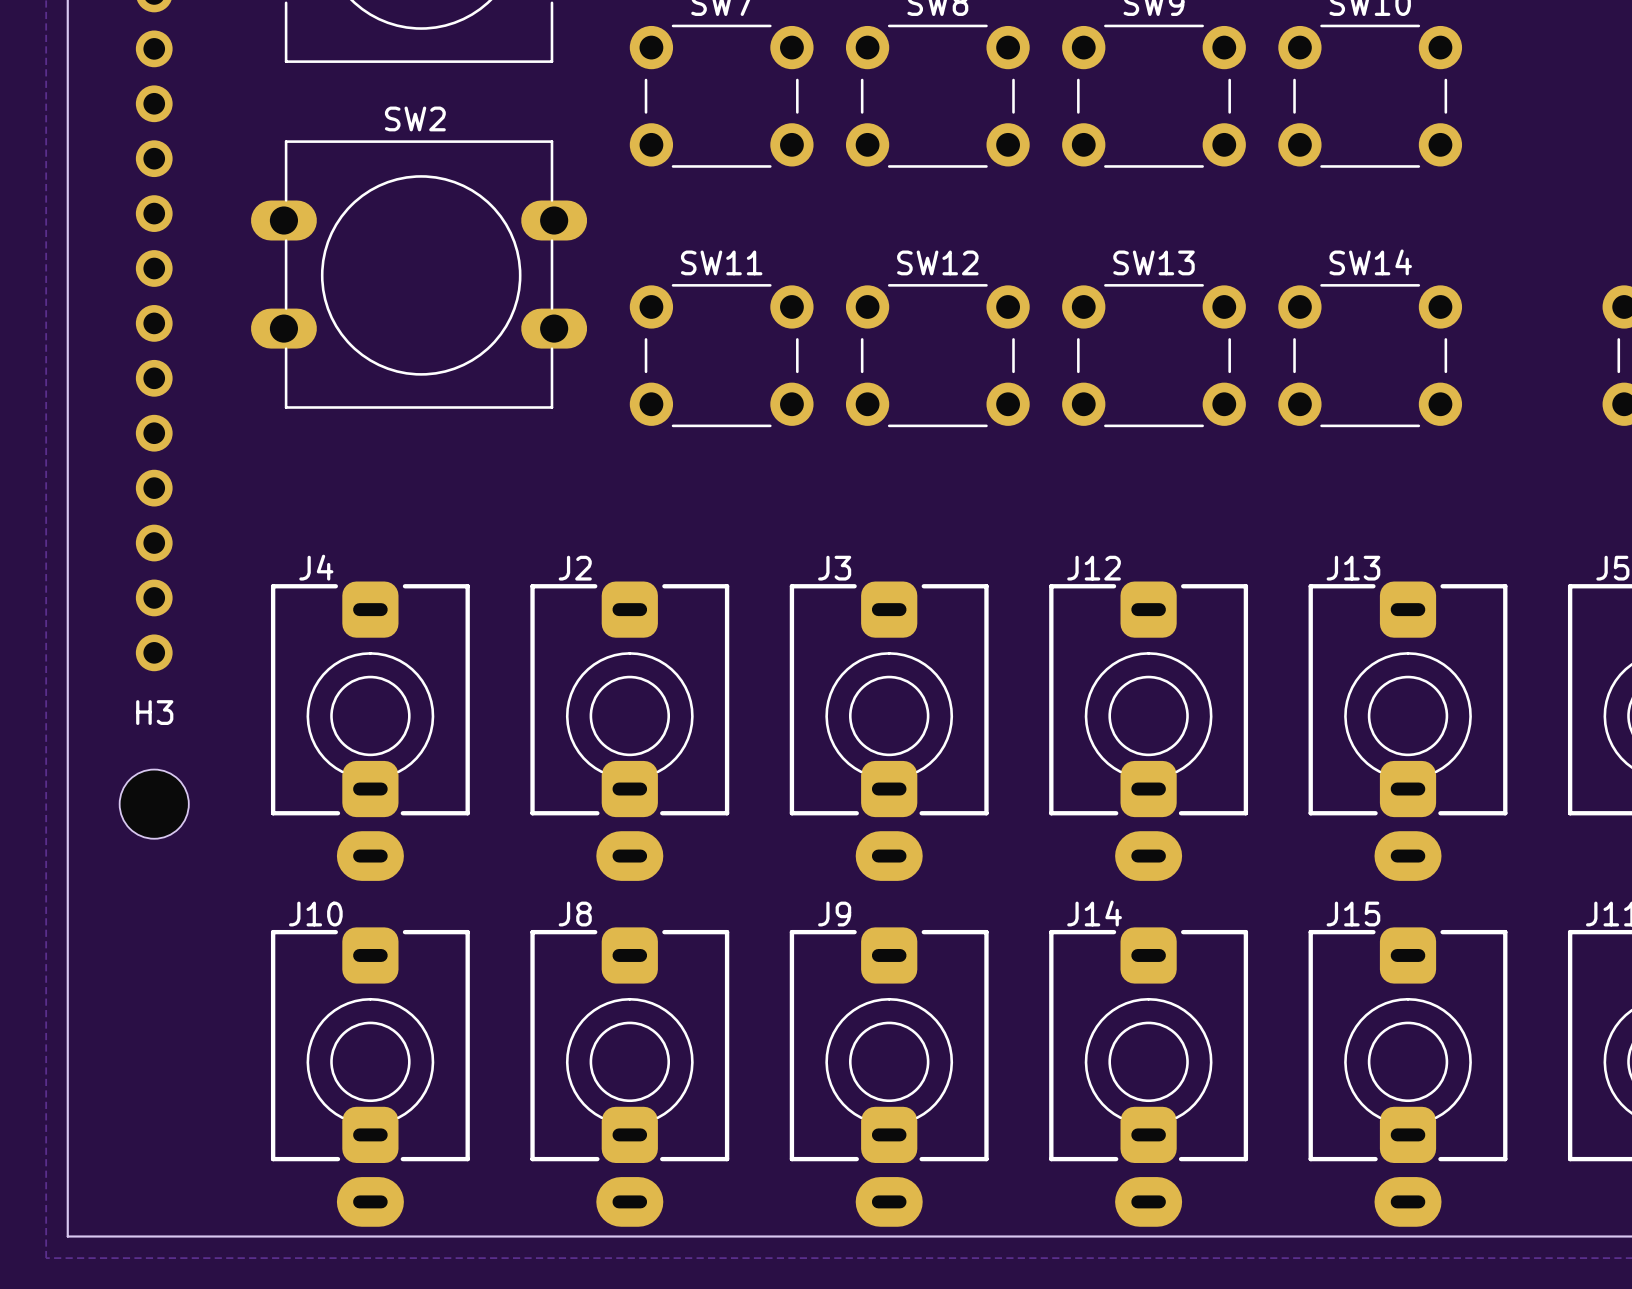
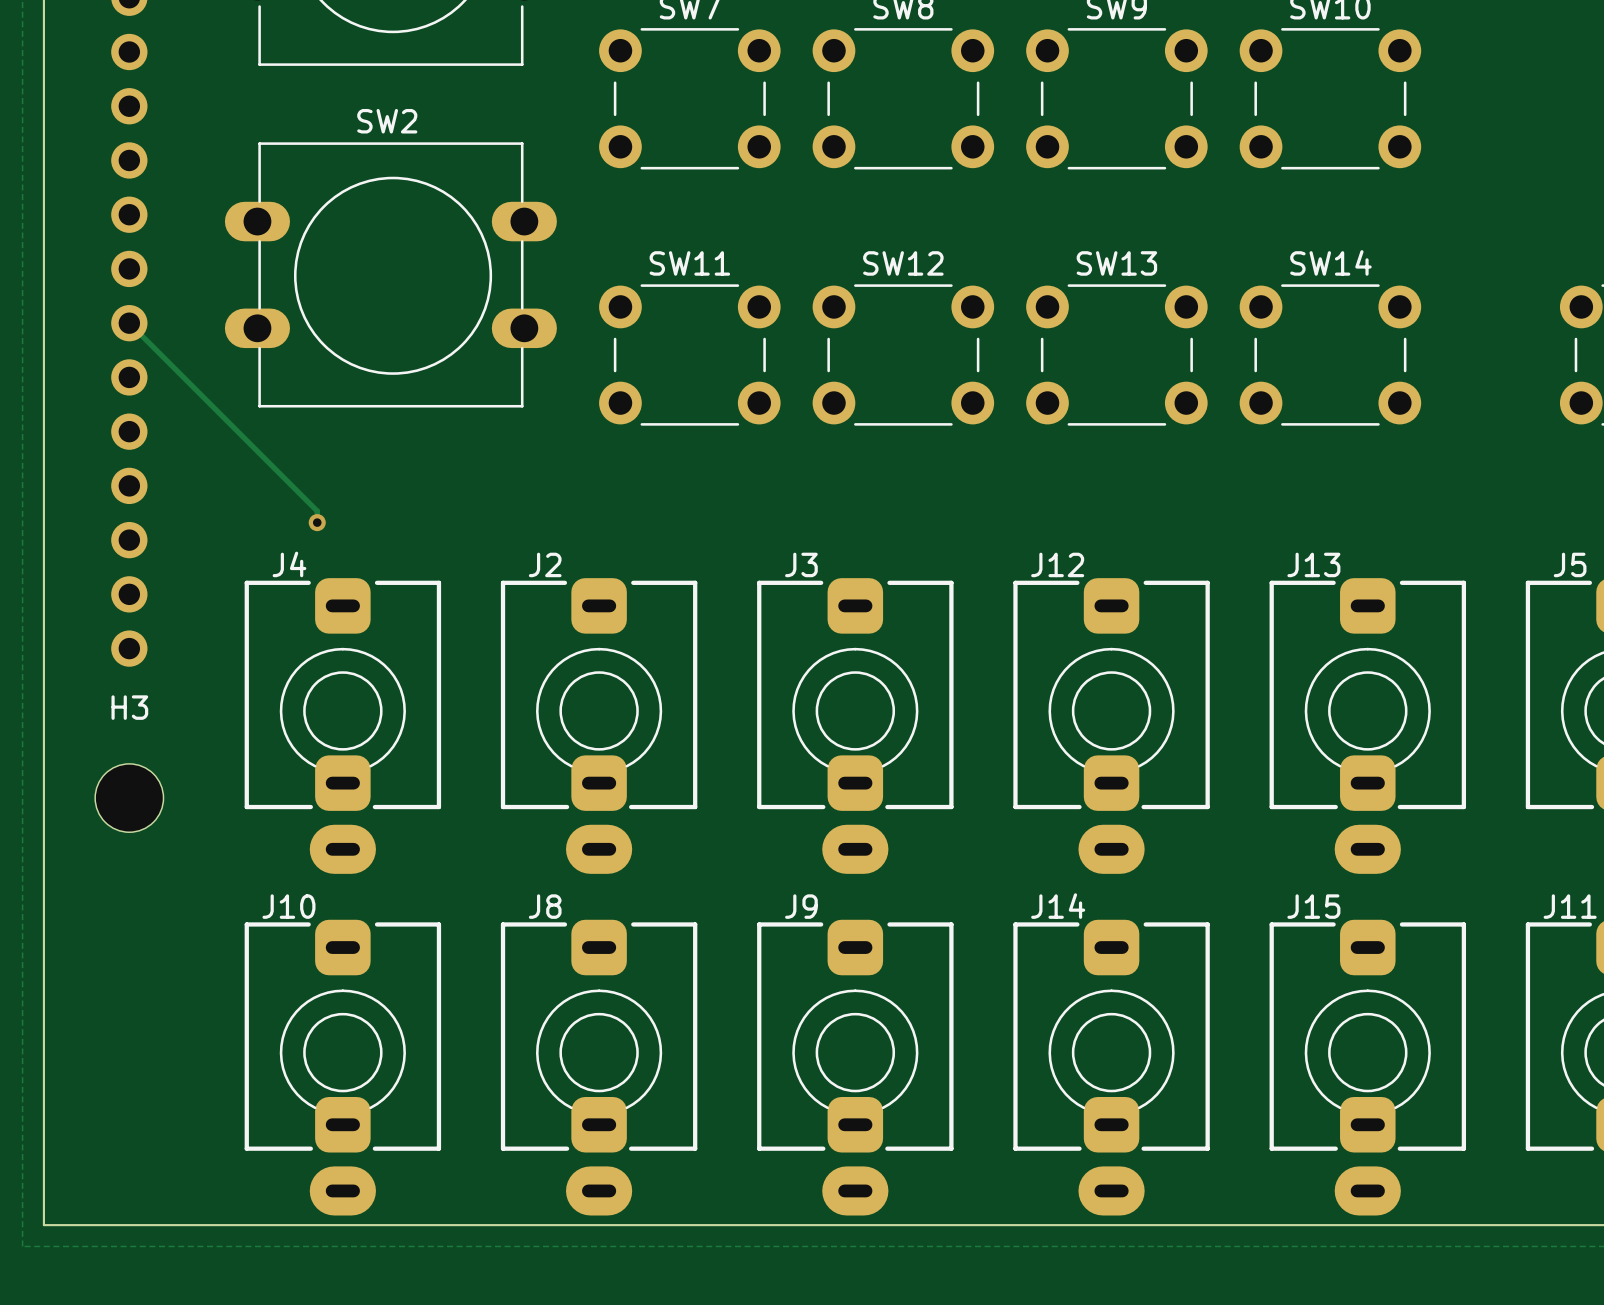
track: none -> (129, 323) (317, 511) (317, 522)
via: none -> (317, 522)

